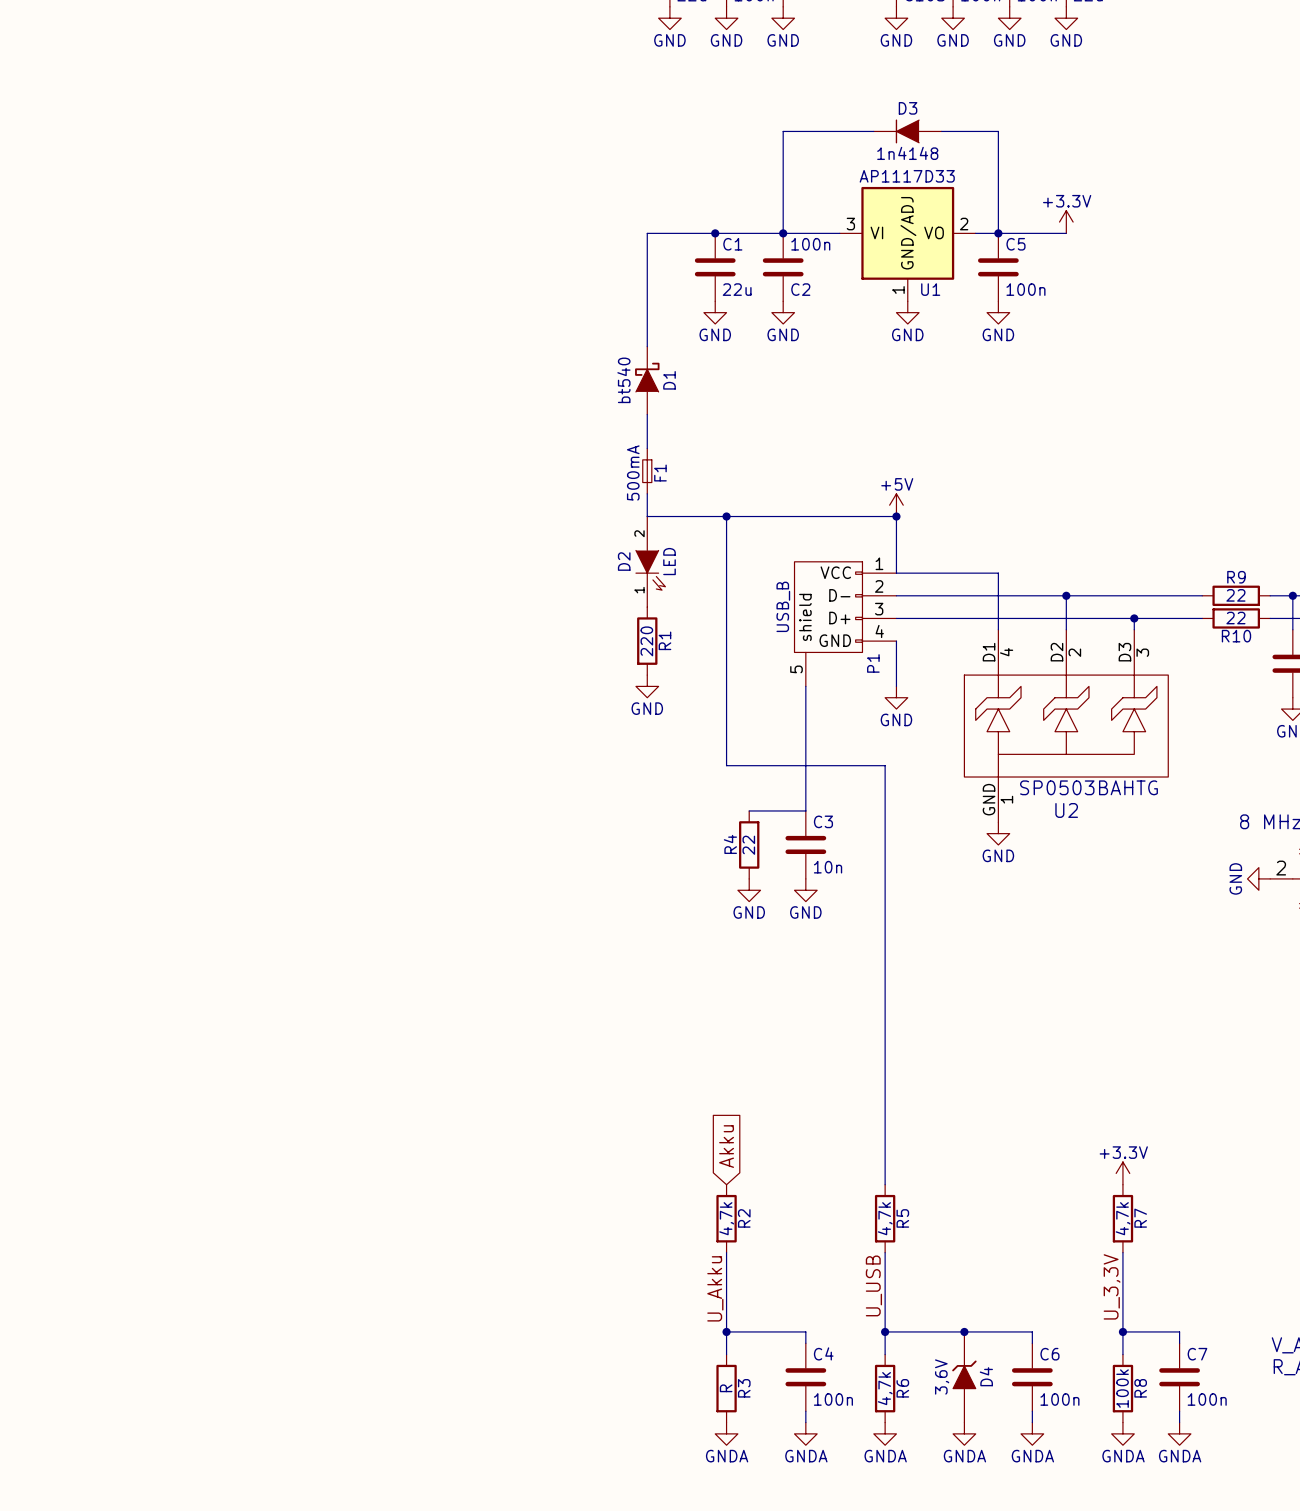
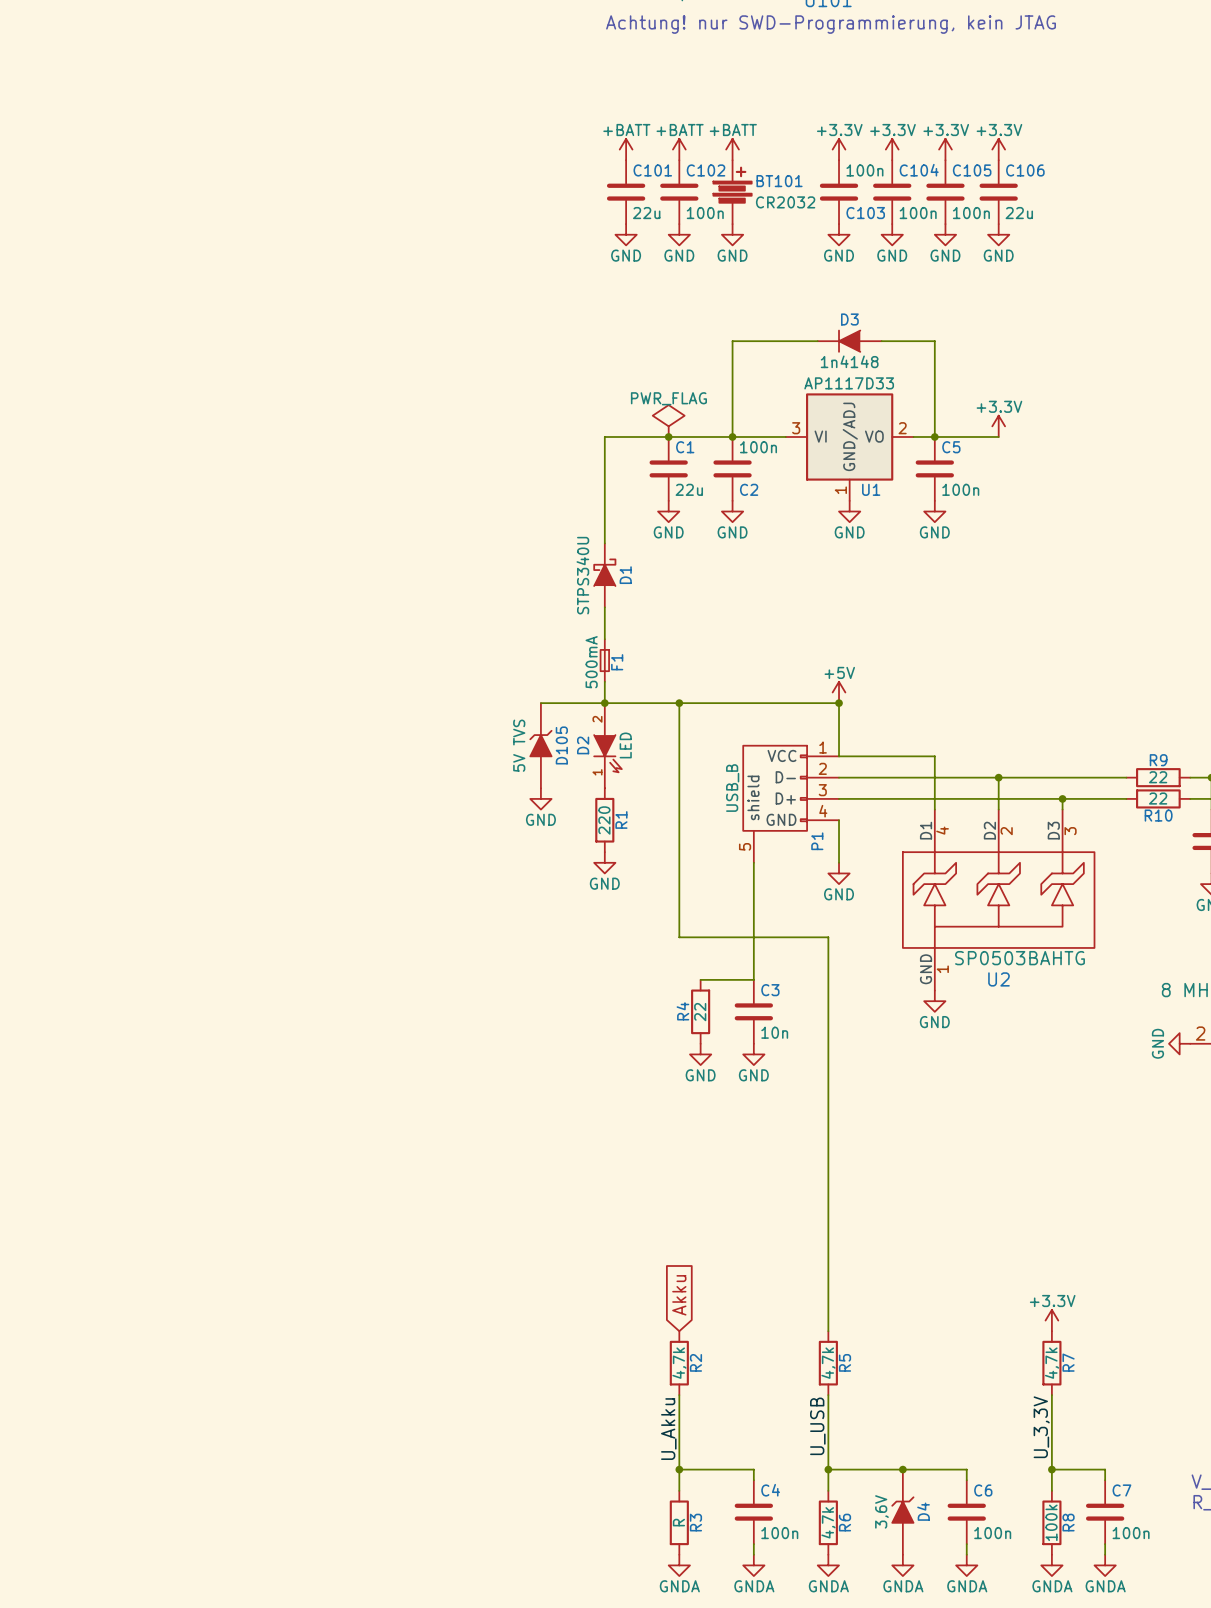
power symbol: none -> PWR_FLAG (668, 421)
D1 value: bt540 (623, 380) -> STPS340U (582, 575)
wire: none -> (540, 703) (604, 703)
junction: none -> (604, 703)
D105: none -> 5V TVS (540, 745)
power symbol: none -> GND (540, 798)

